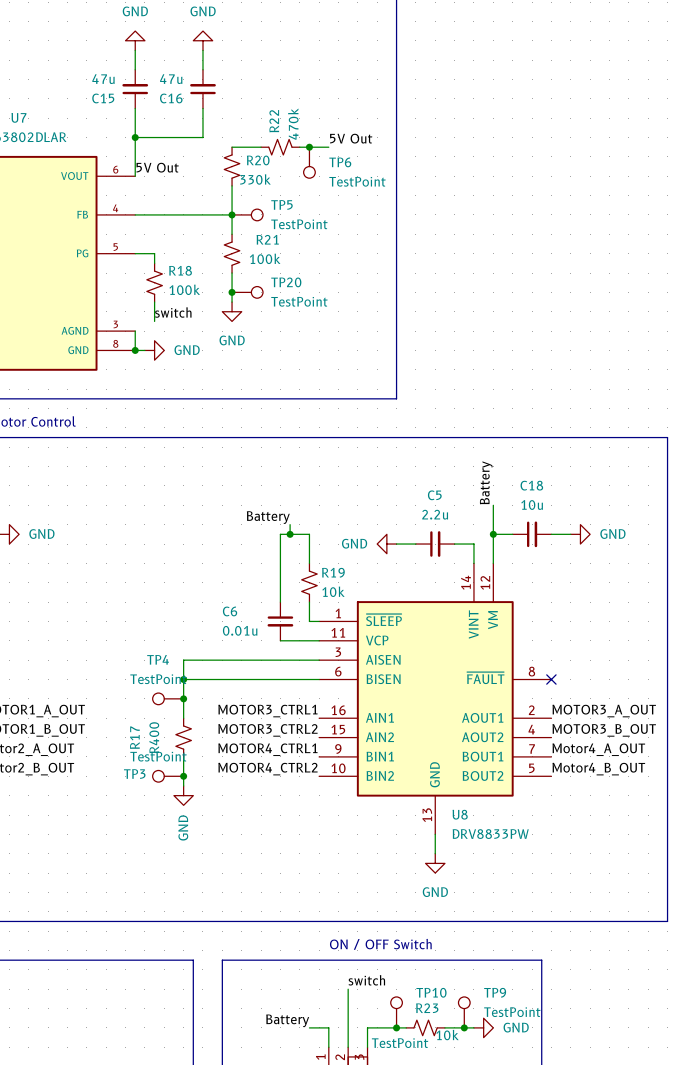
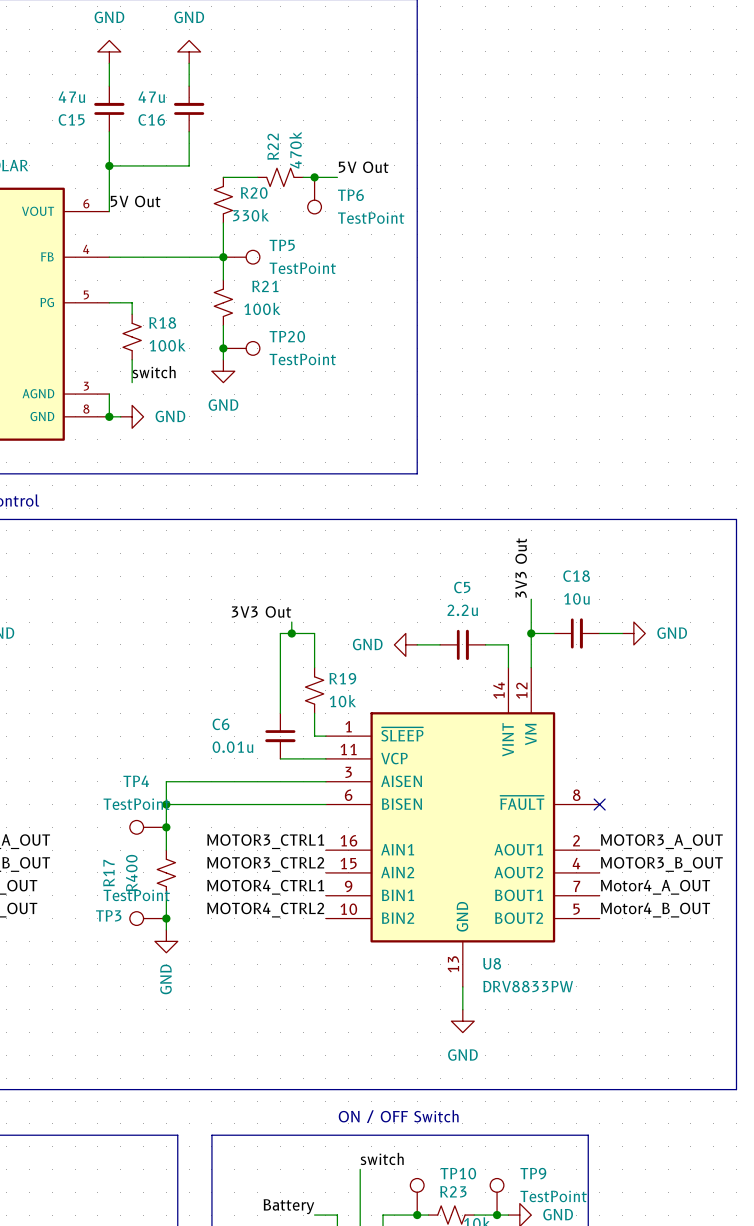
label: Battery (486, 482) -> 3V3 Out (521, 568)
label: Battery (268, 517) -> 3V3 Out (261, 611)

